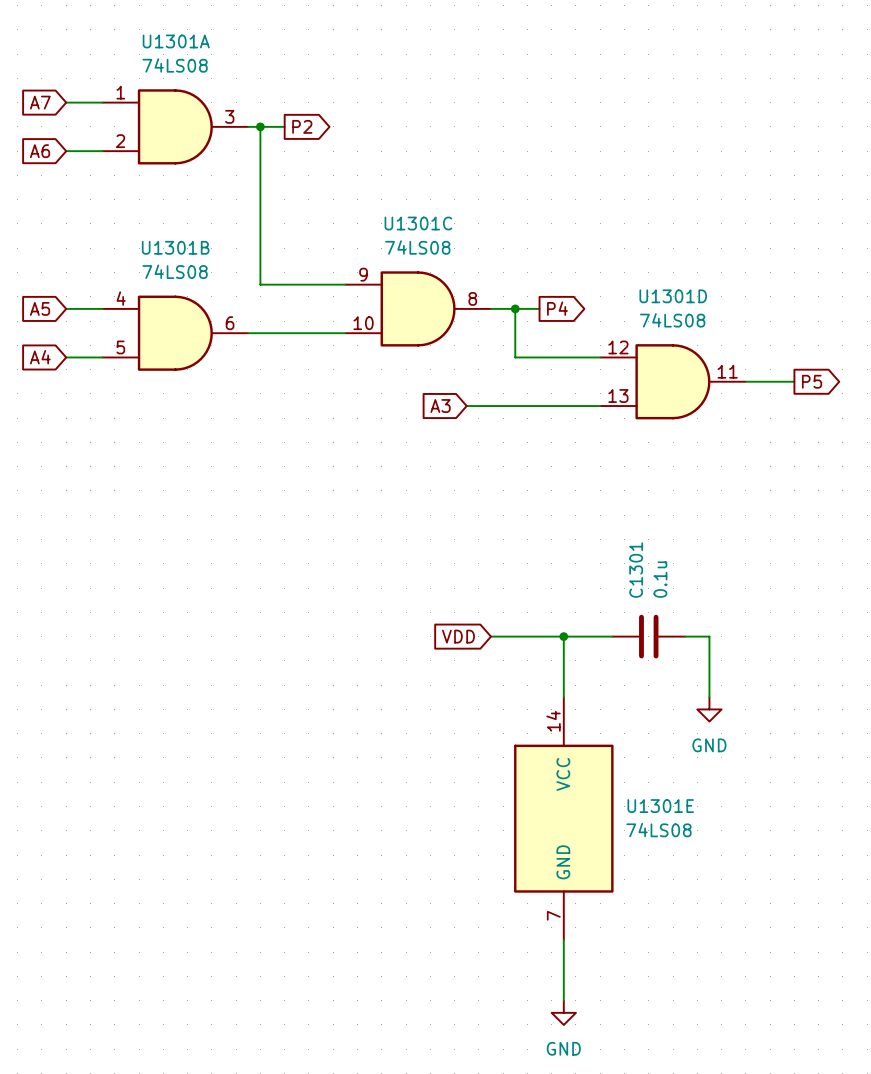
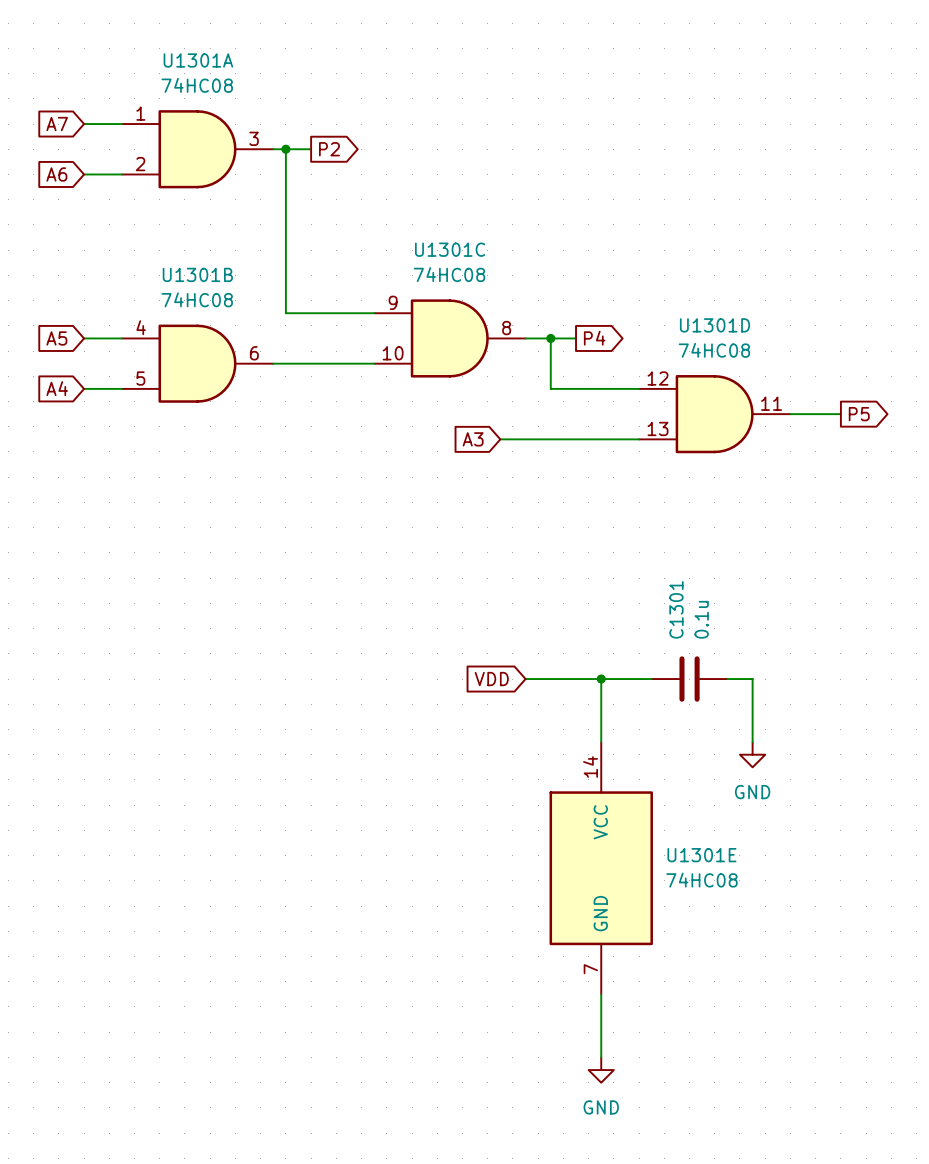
U1301A value: 74LS08 (175, 65) -> 74HC08 (197, 85)
U1301C value: 74LS08 (417, 247) -> 74HC08 (449, 274)
U1301B value: 74LS08 (175, 271) -> 74HC08 (197, 299)
U1301D value: 74LS08 (672, 320) -> 74HC08 (714, 350)
U1301E value: 74LS08 (658, 830) -> 74HC08 (701, 880)

